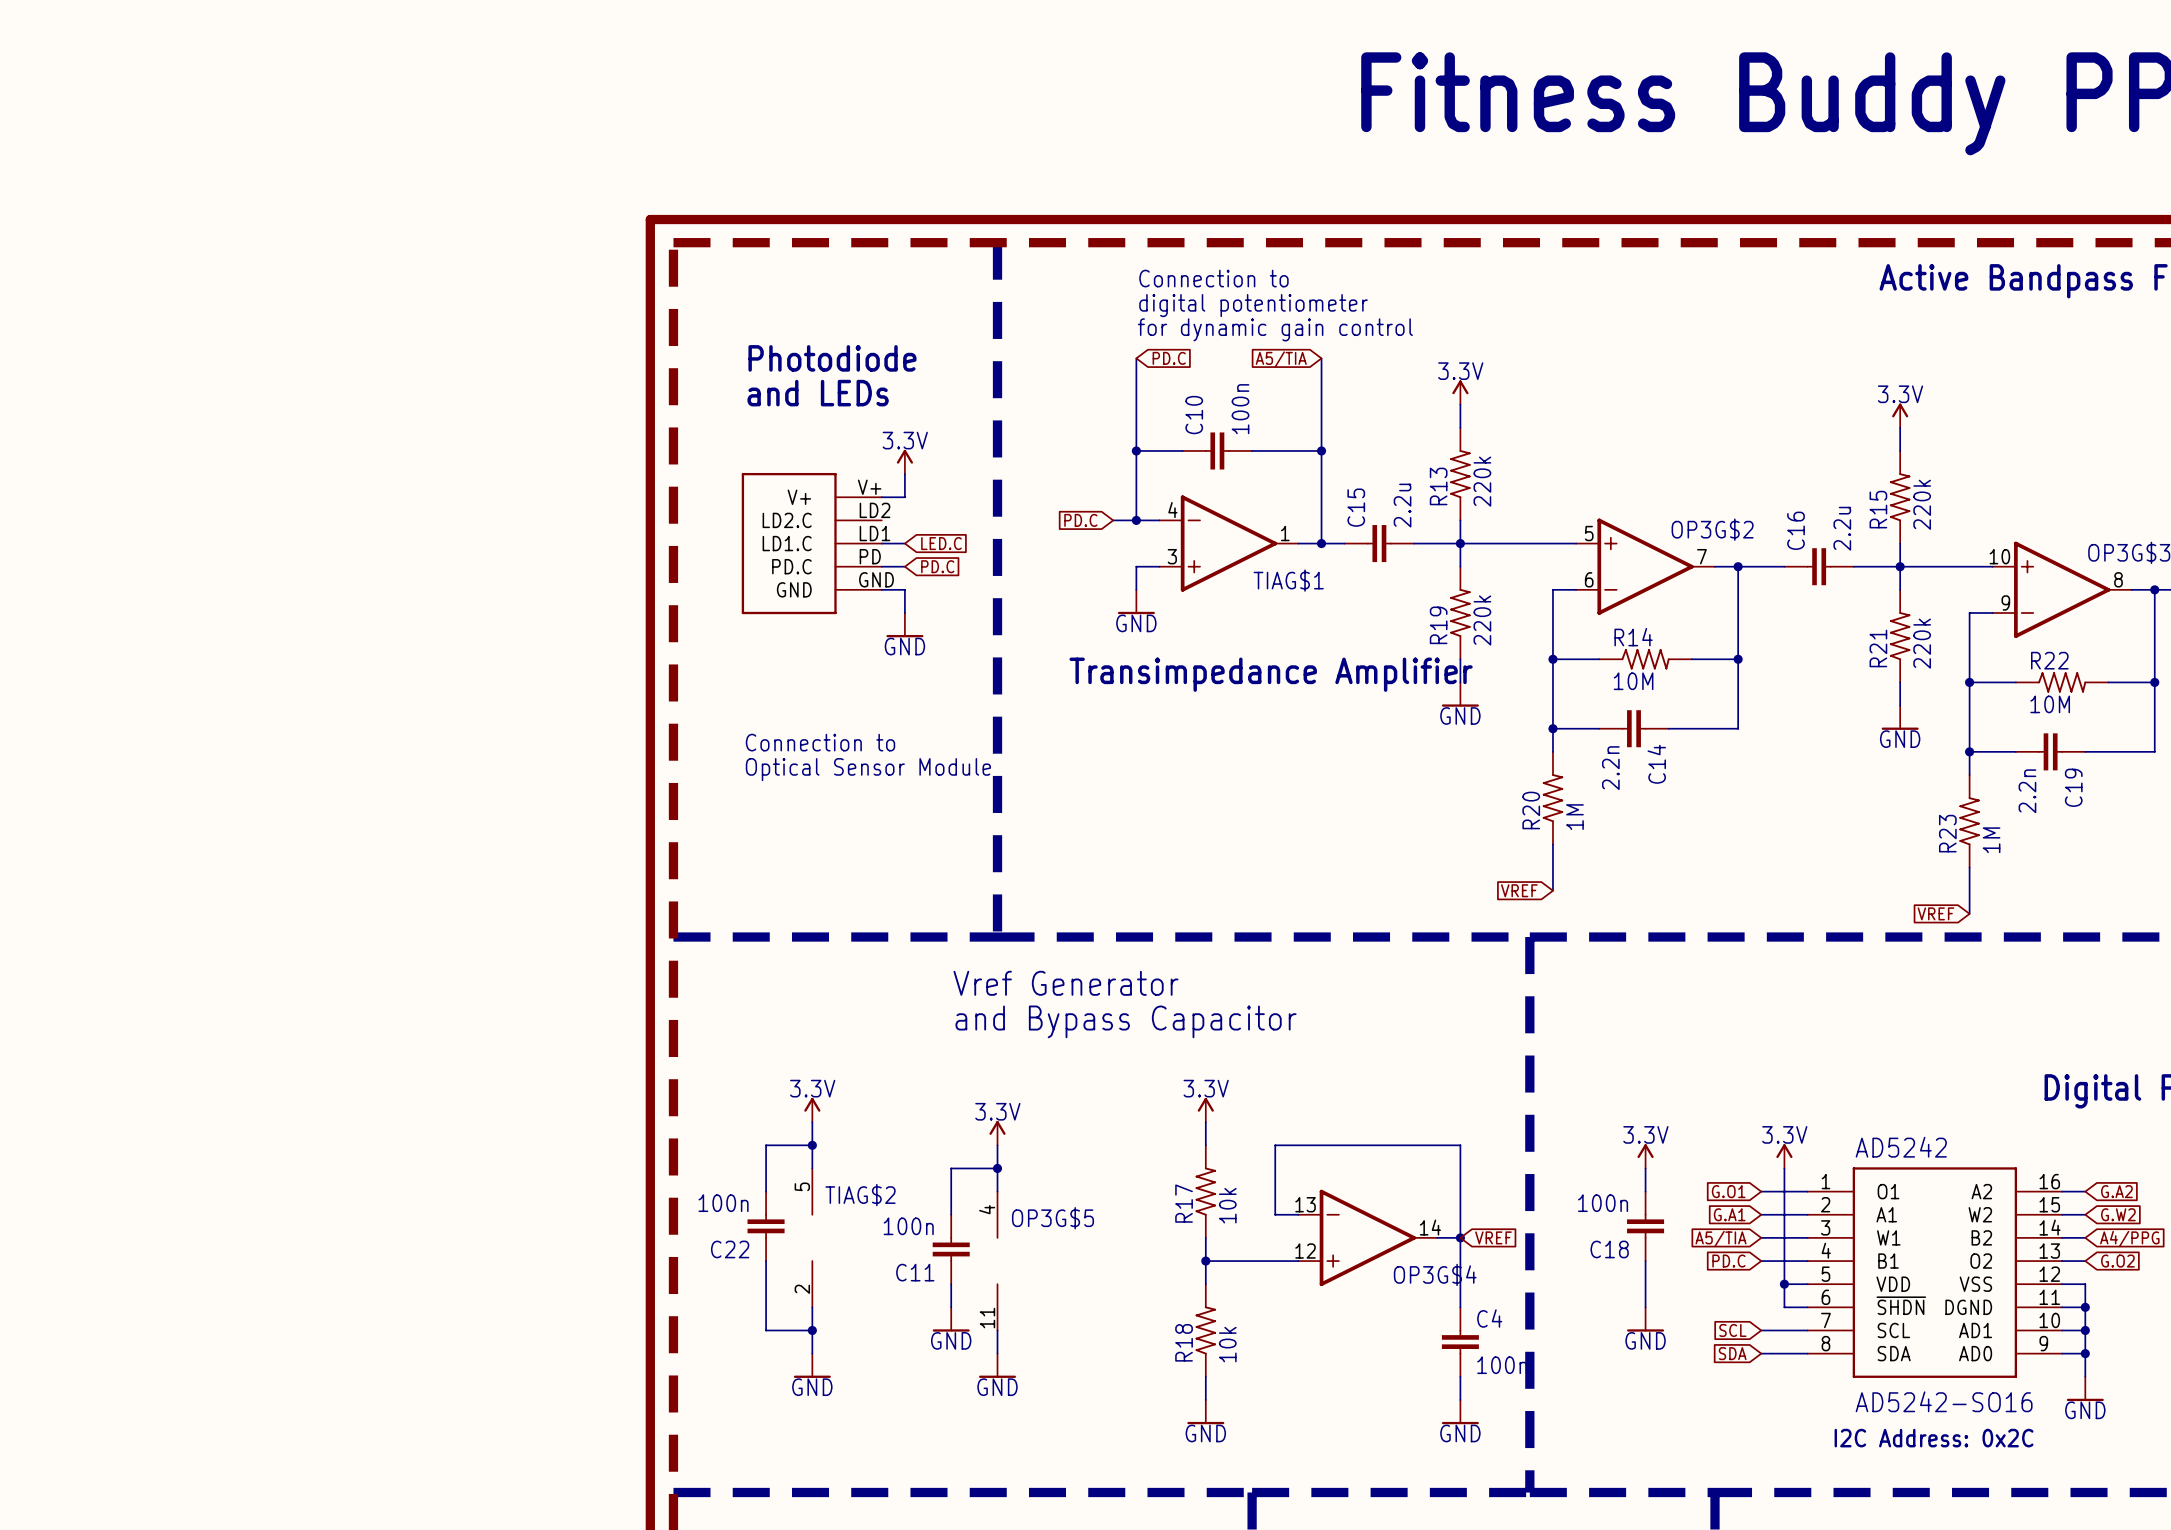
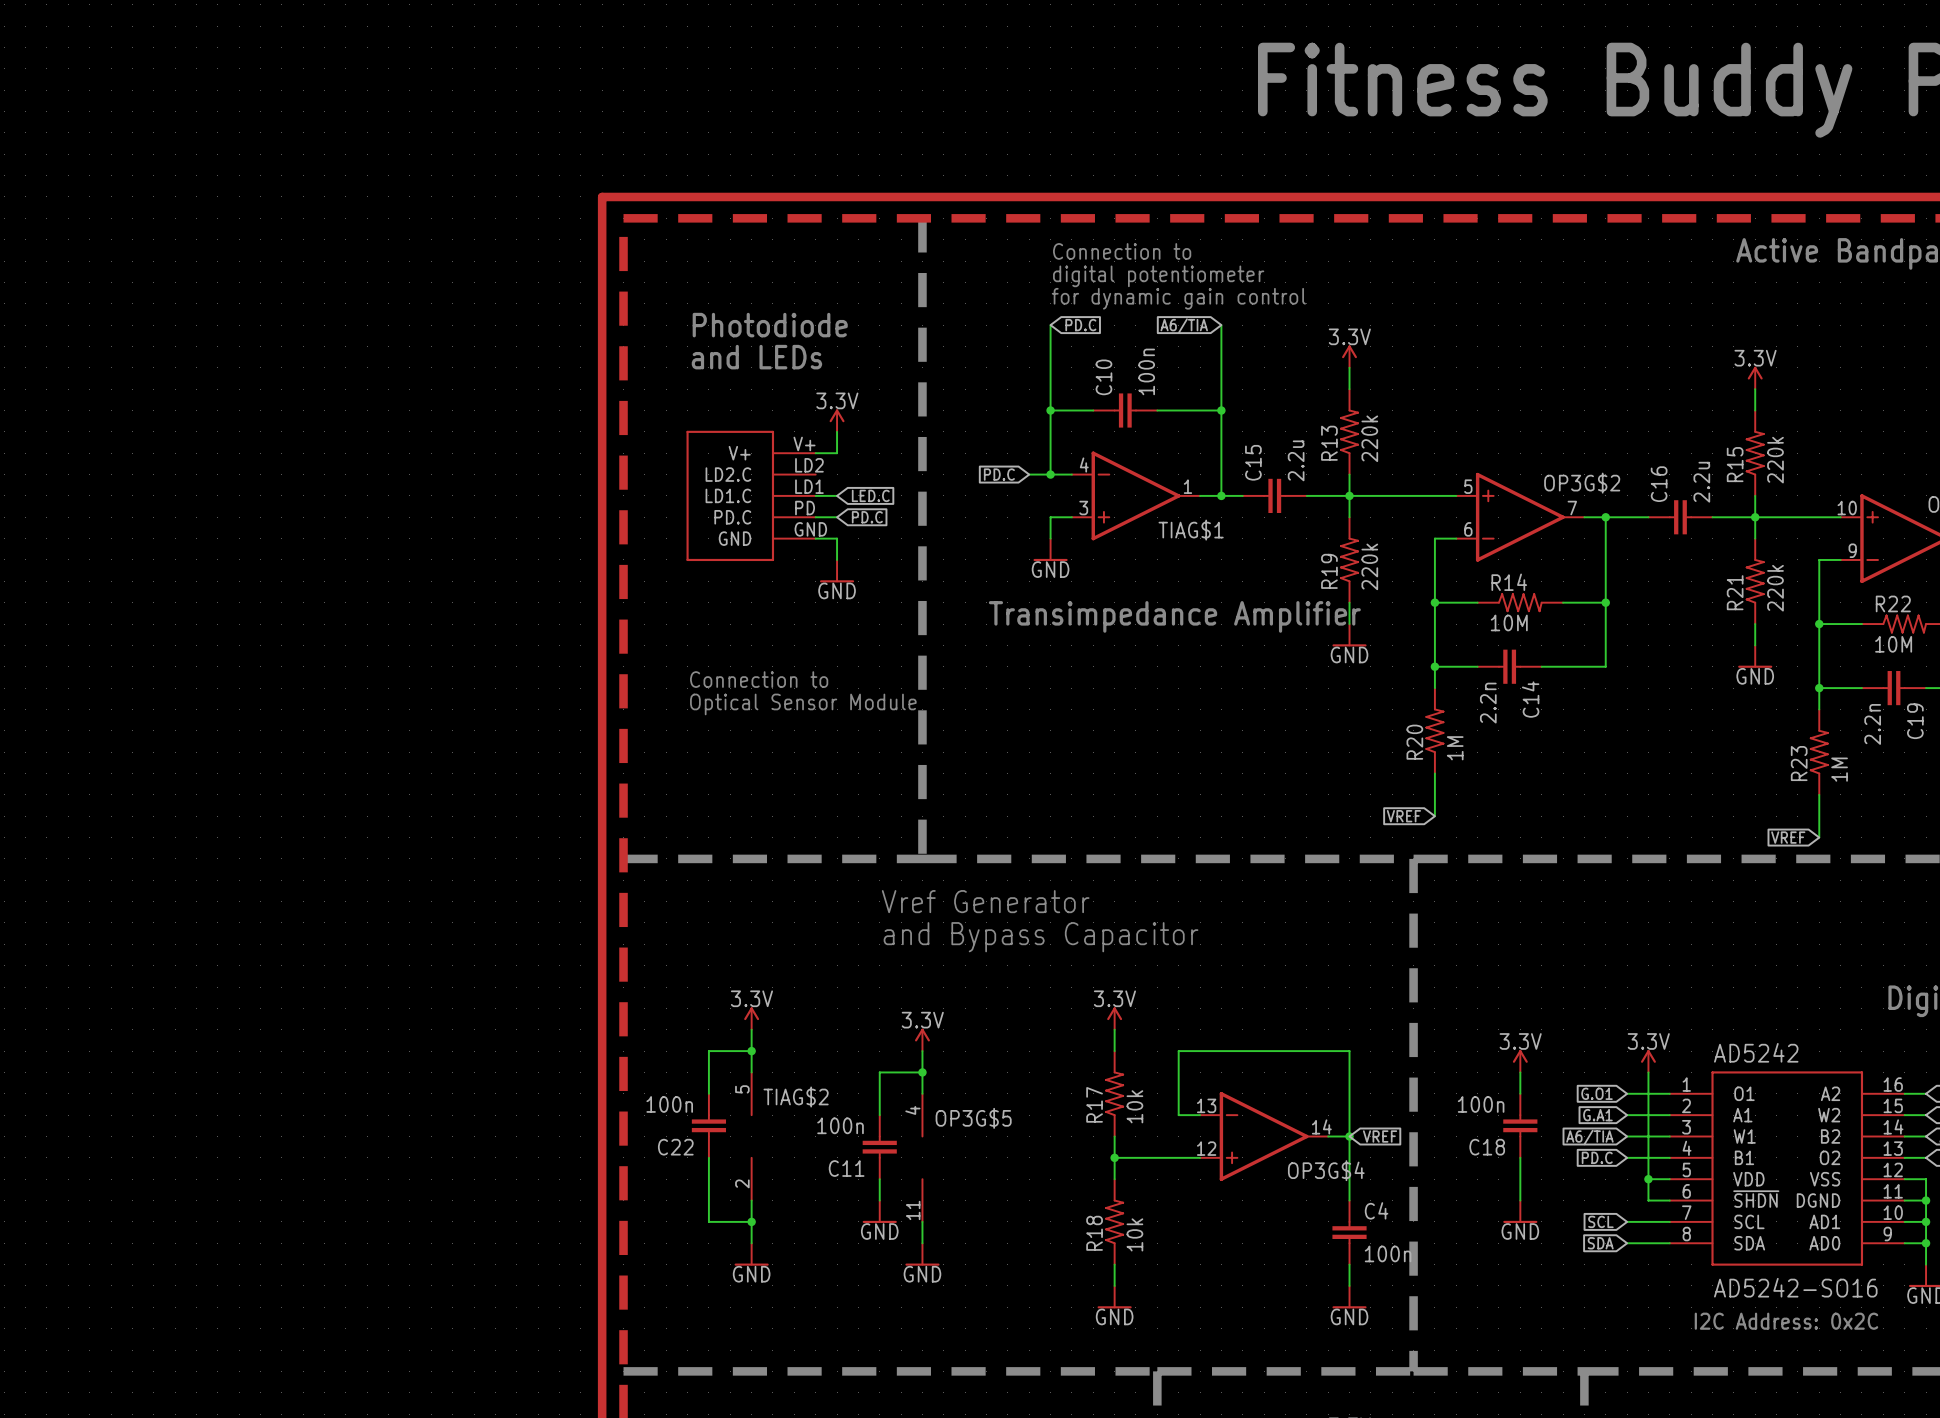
global label: A5/TIA (1281, 359) -> A6/TIA (1184, 326)
global label: A5/TIA (1721, 1239) -> A6/TIA (1589, 1137)

